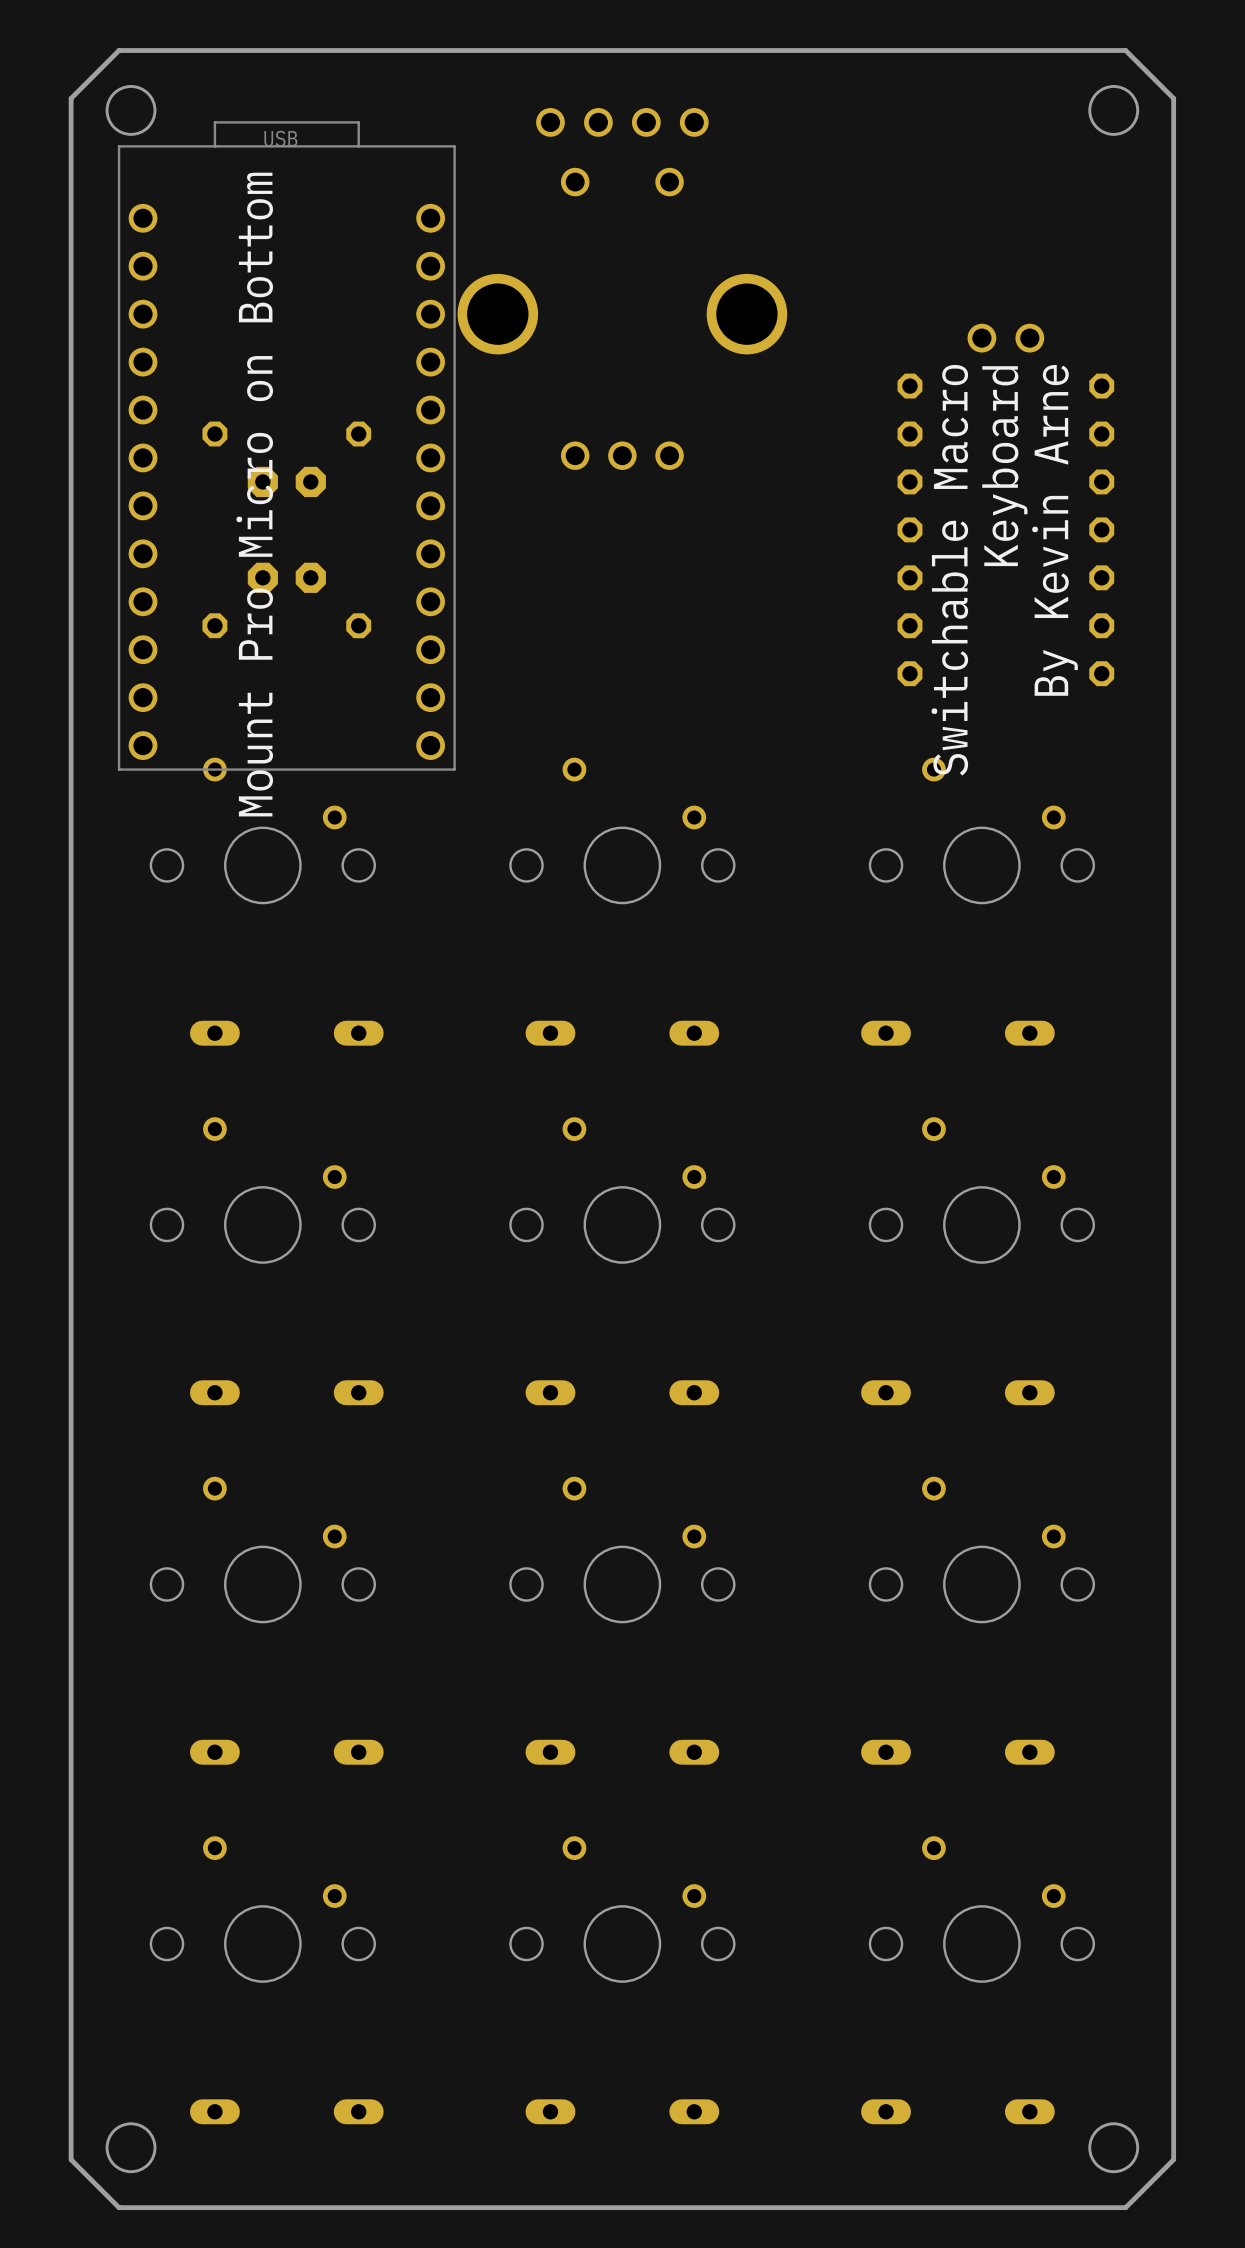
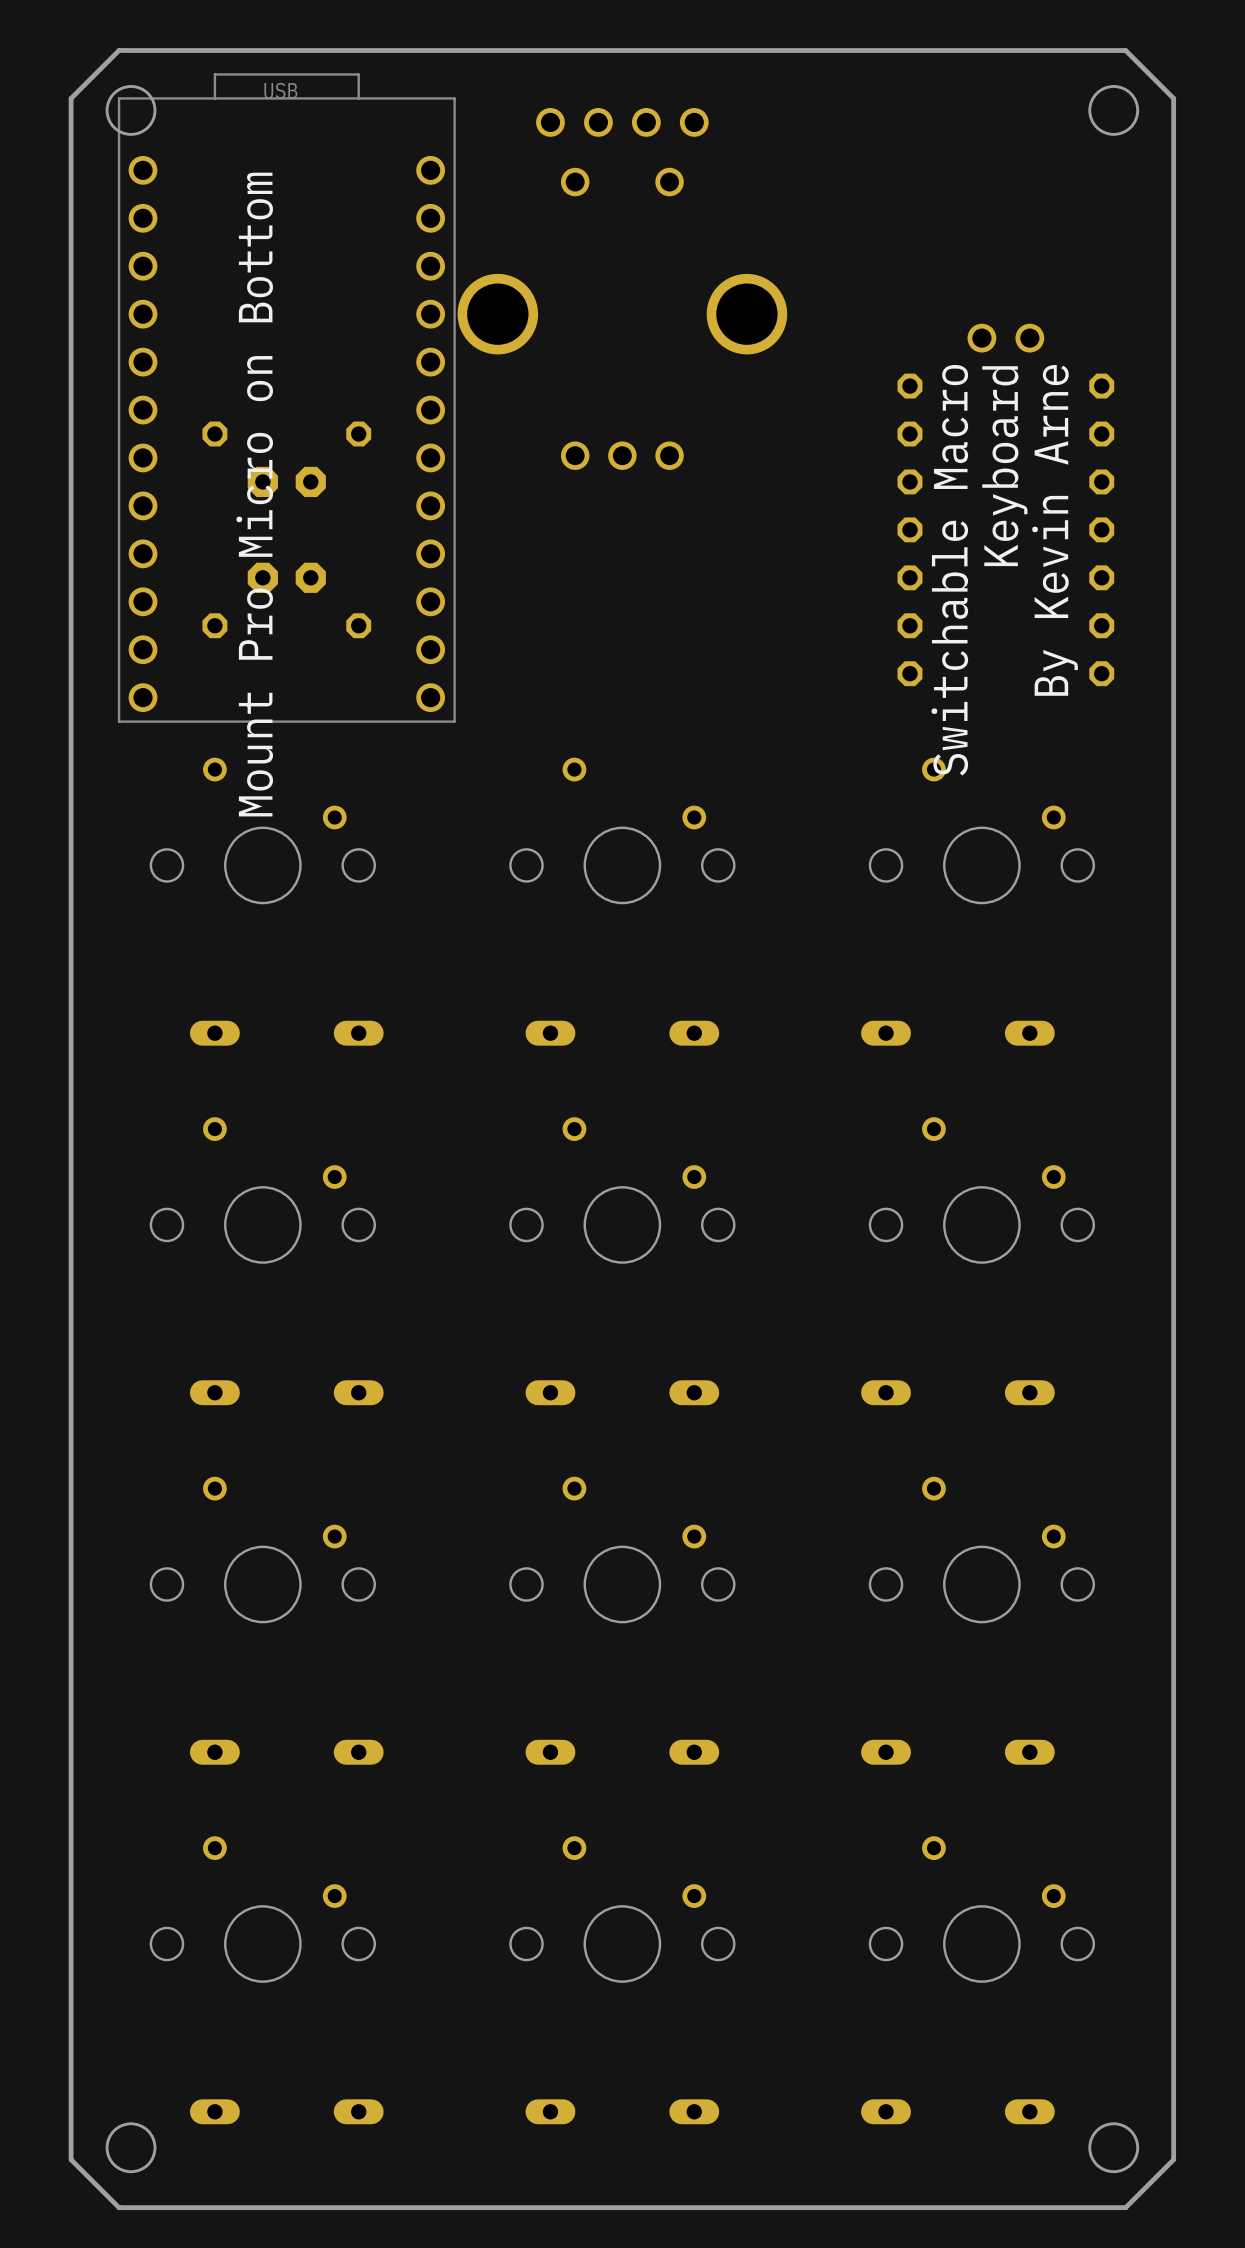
part position: (286, 445) -> (286, 398)

